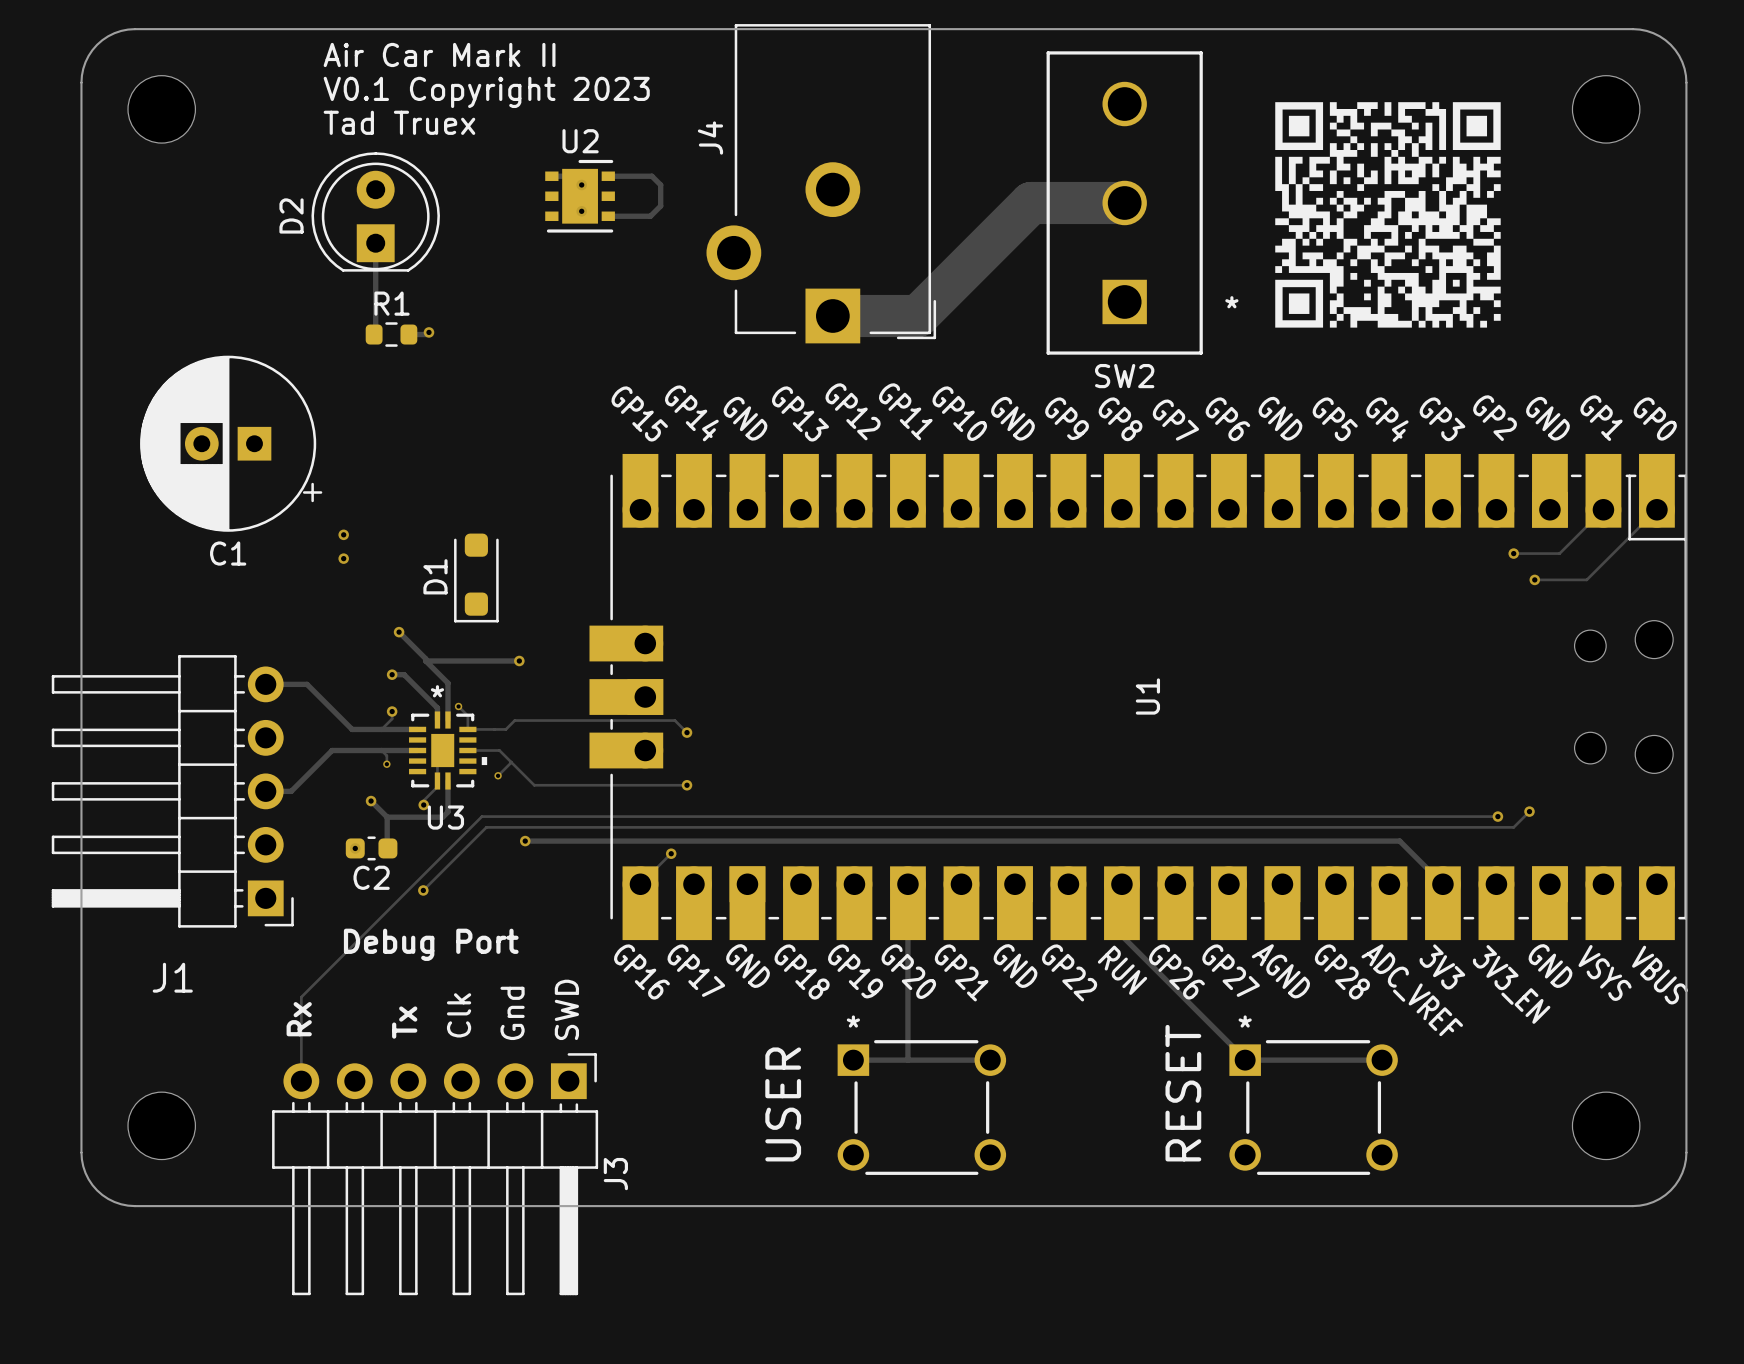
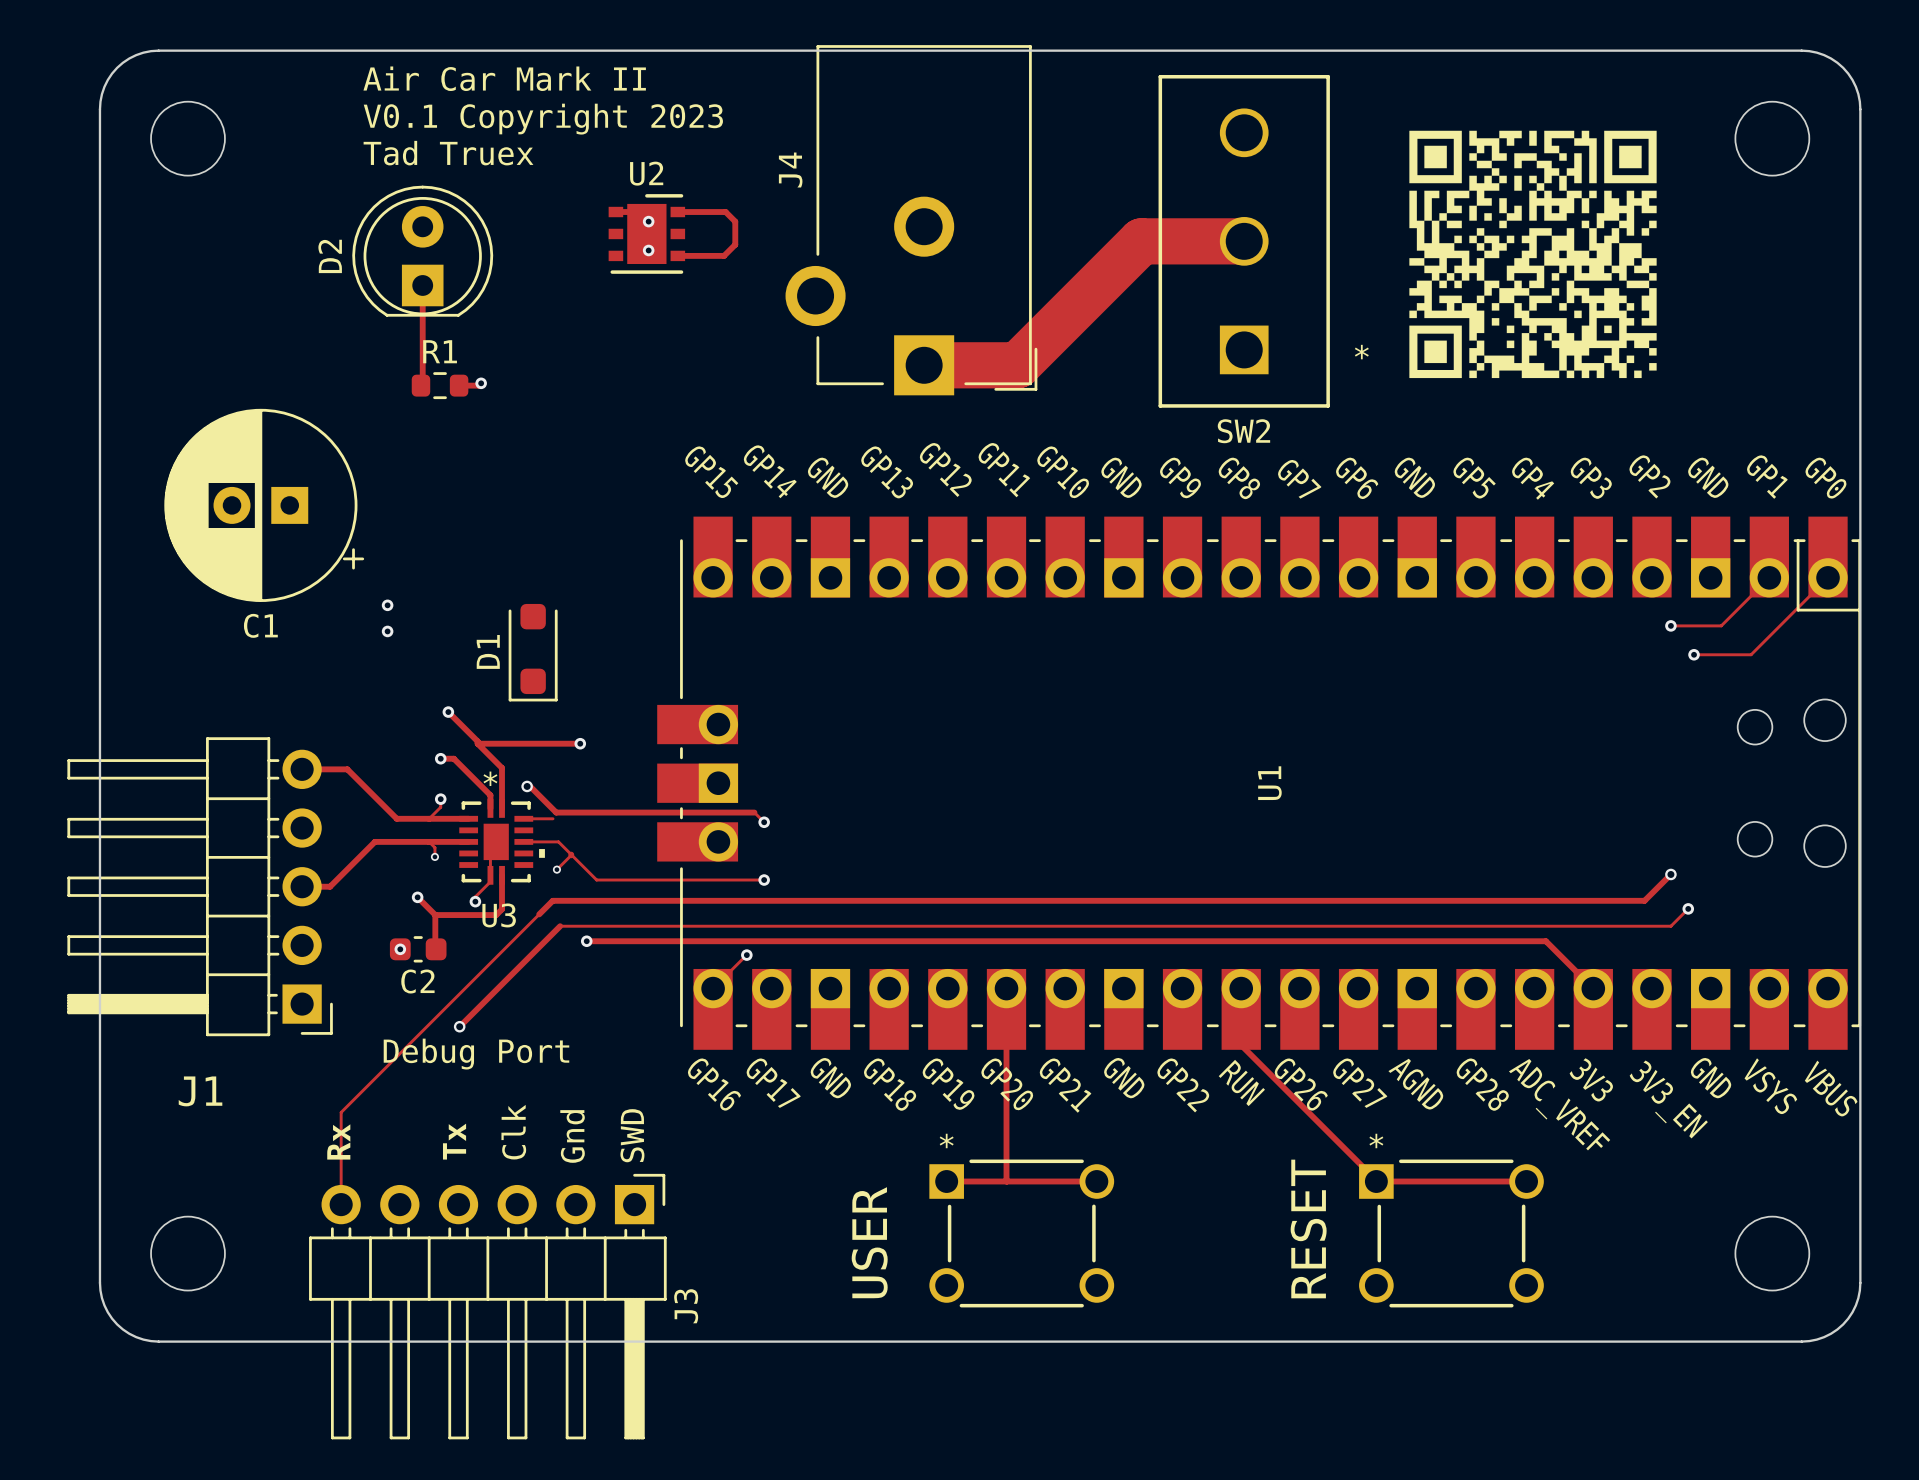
via: none -> (527, 786)
track: (458, 706) (467, 715) (467, 729) -> none
via: (458, 706) -> none
track: (678, 723) (674, 720) (514, 720) (505, 729) (494, 729) -> (754, 812) (556, 812) (530, 786) (527, 786)
via: none -> (1670, 874)
track: (481, 816) (1497, 816) -> (539, 914) (552, 900) (1644, 900) (1670, 874)
via: (1497, 816) -> none
track: (501, 827) (486, 827) (423, 890) -> (560, 926) (459, 1026)
via: (423, 890) -> none
via: none -> (459, 1026)

